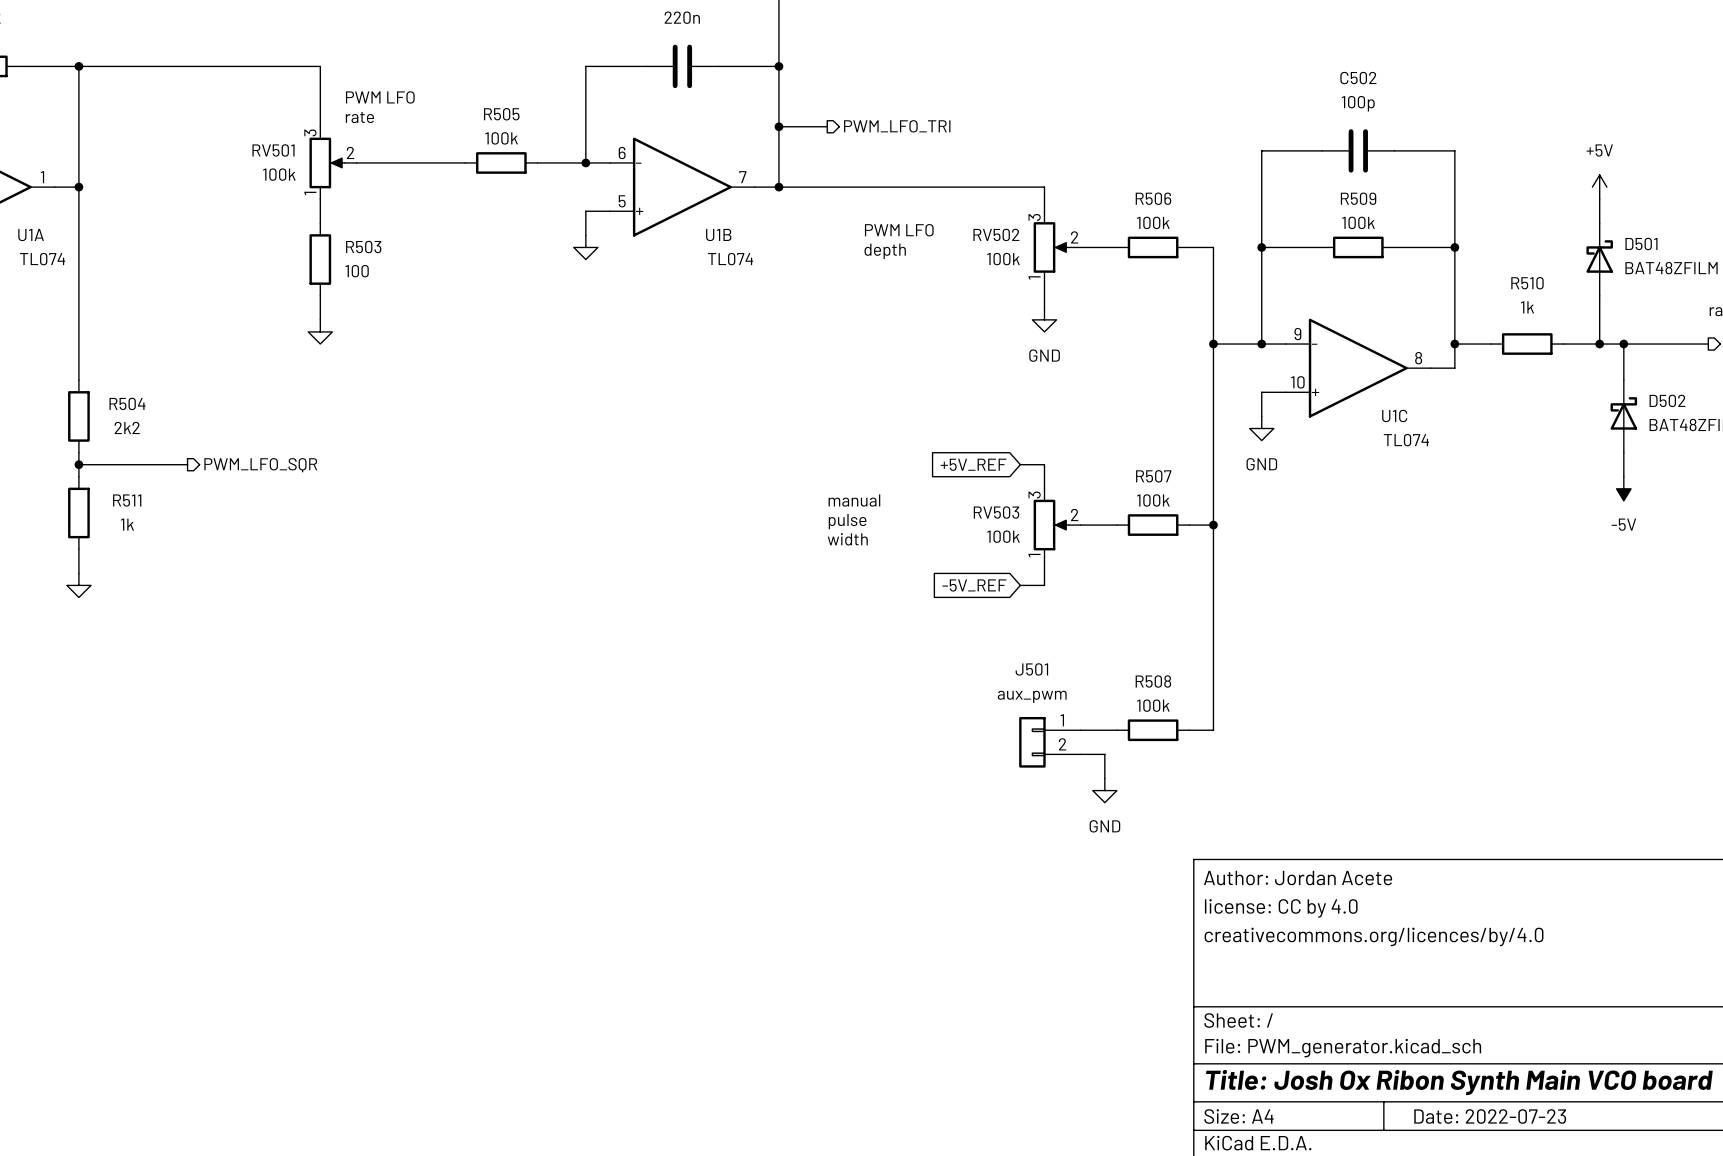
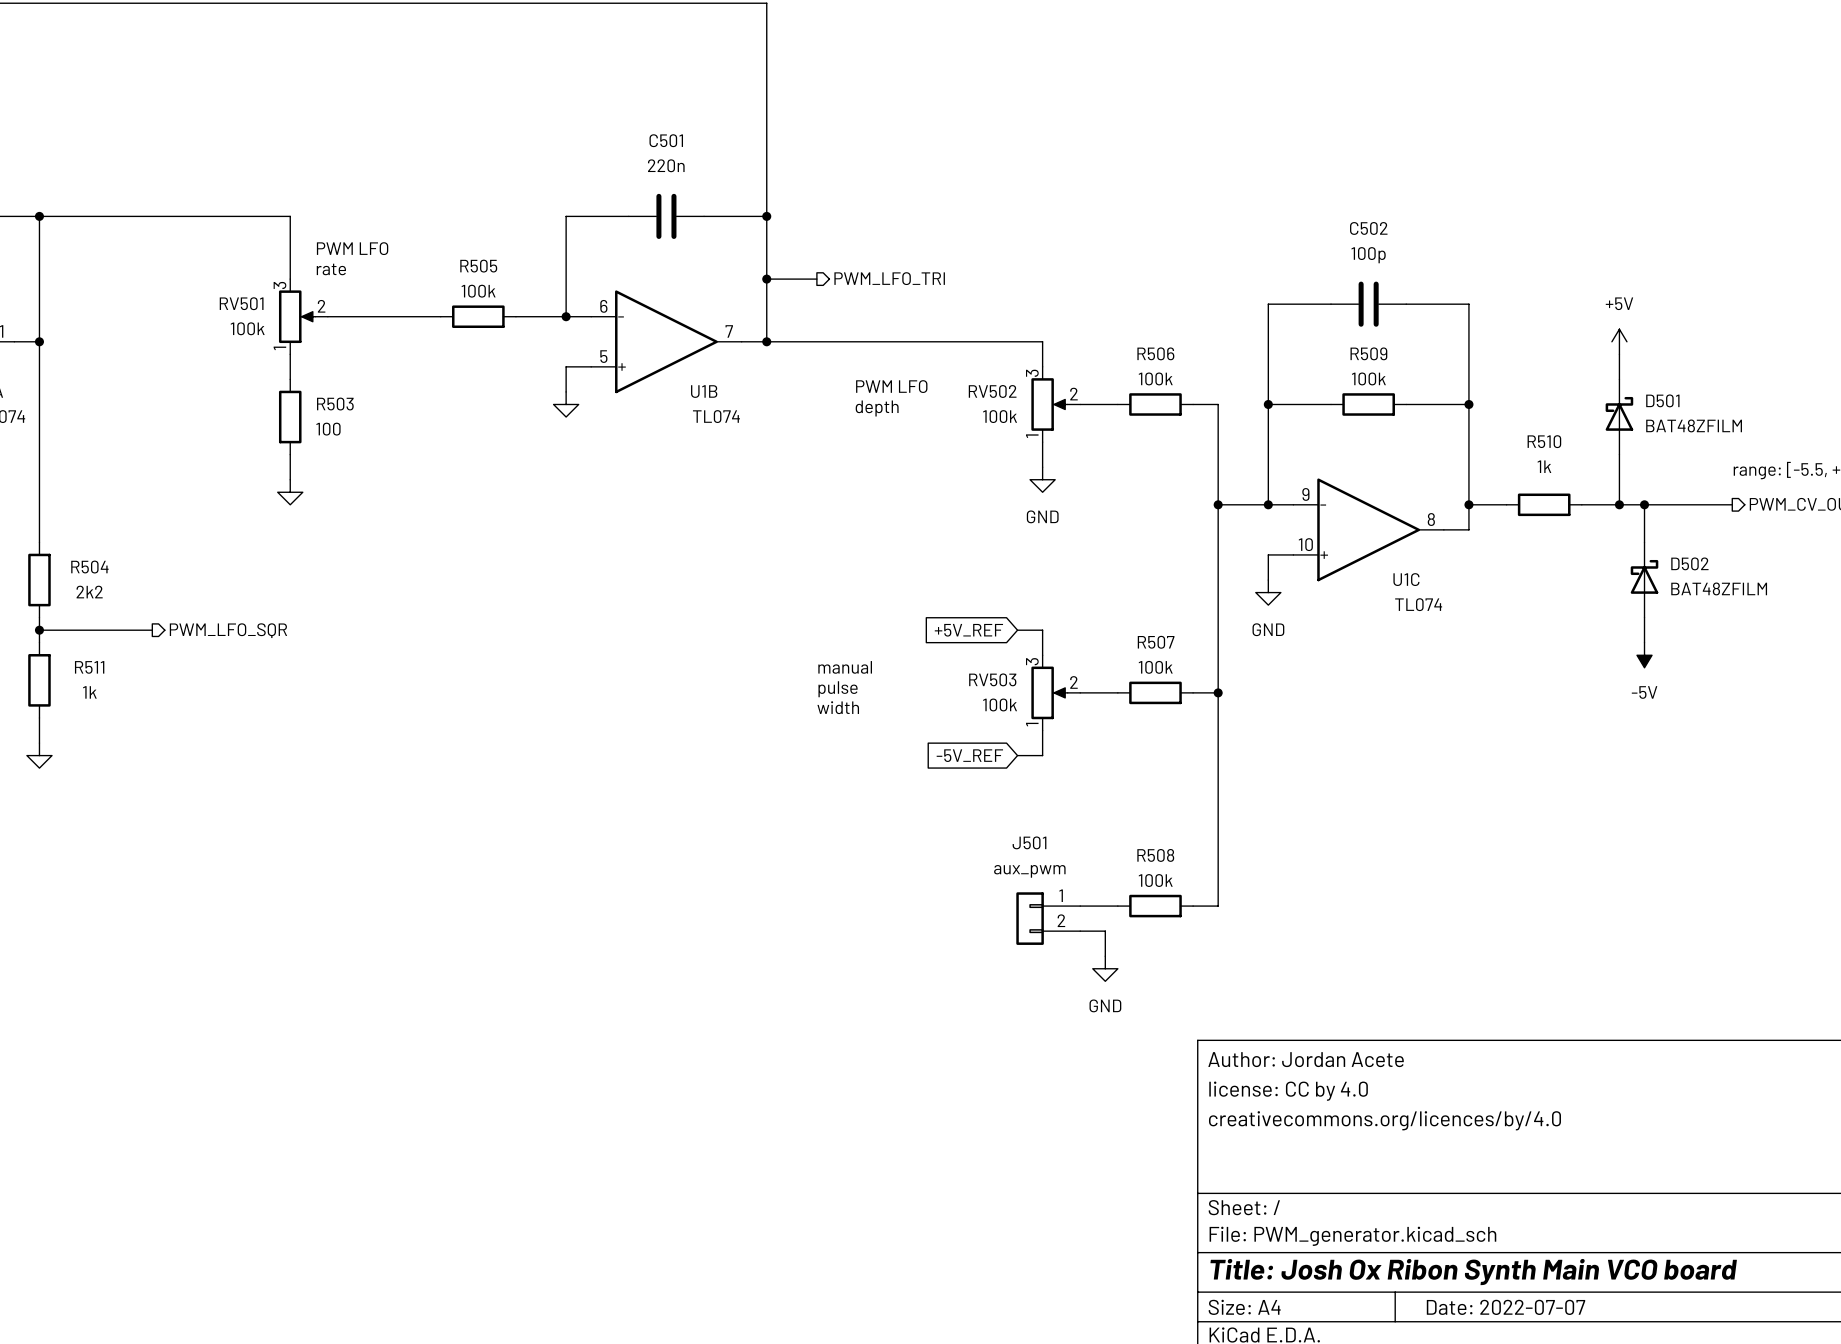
title block: Date: 2022-07-23 (1490, 1116) -> Date: 2022-07-07 (1506, 1307)

